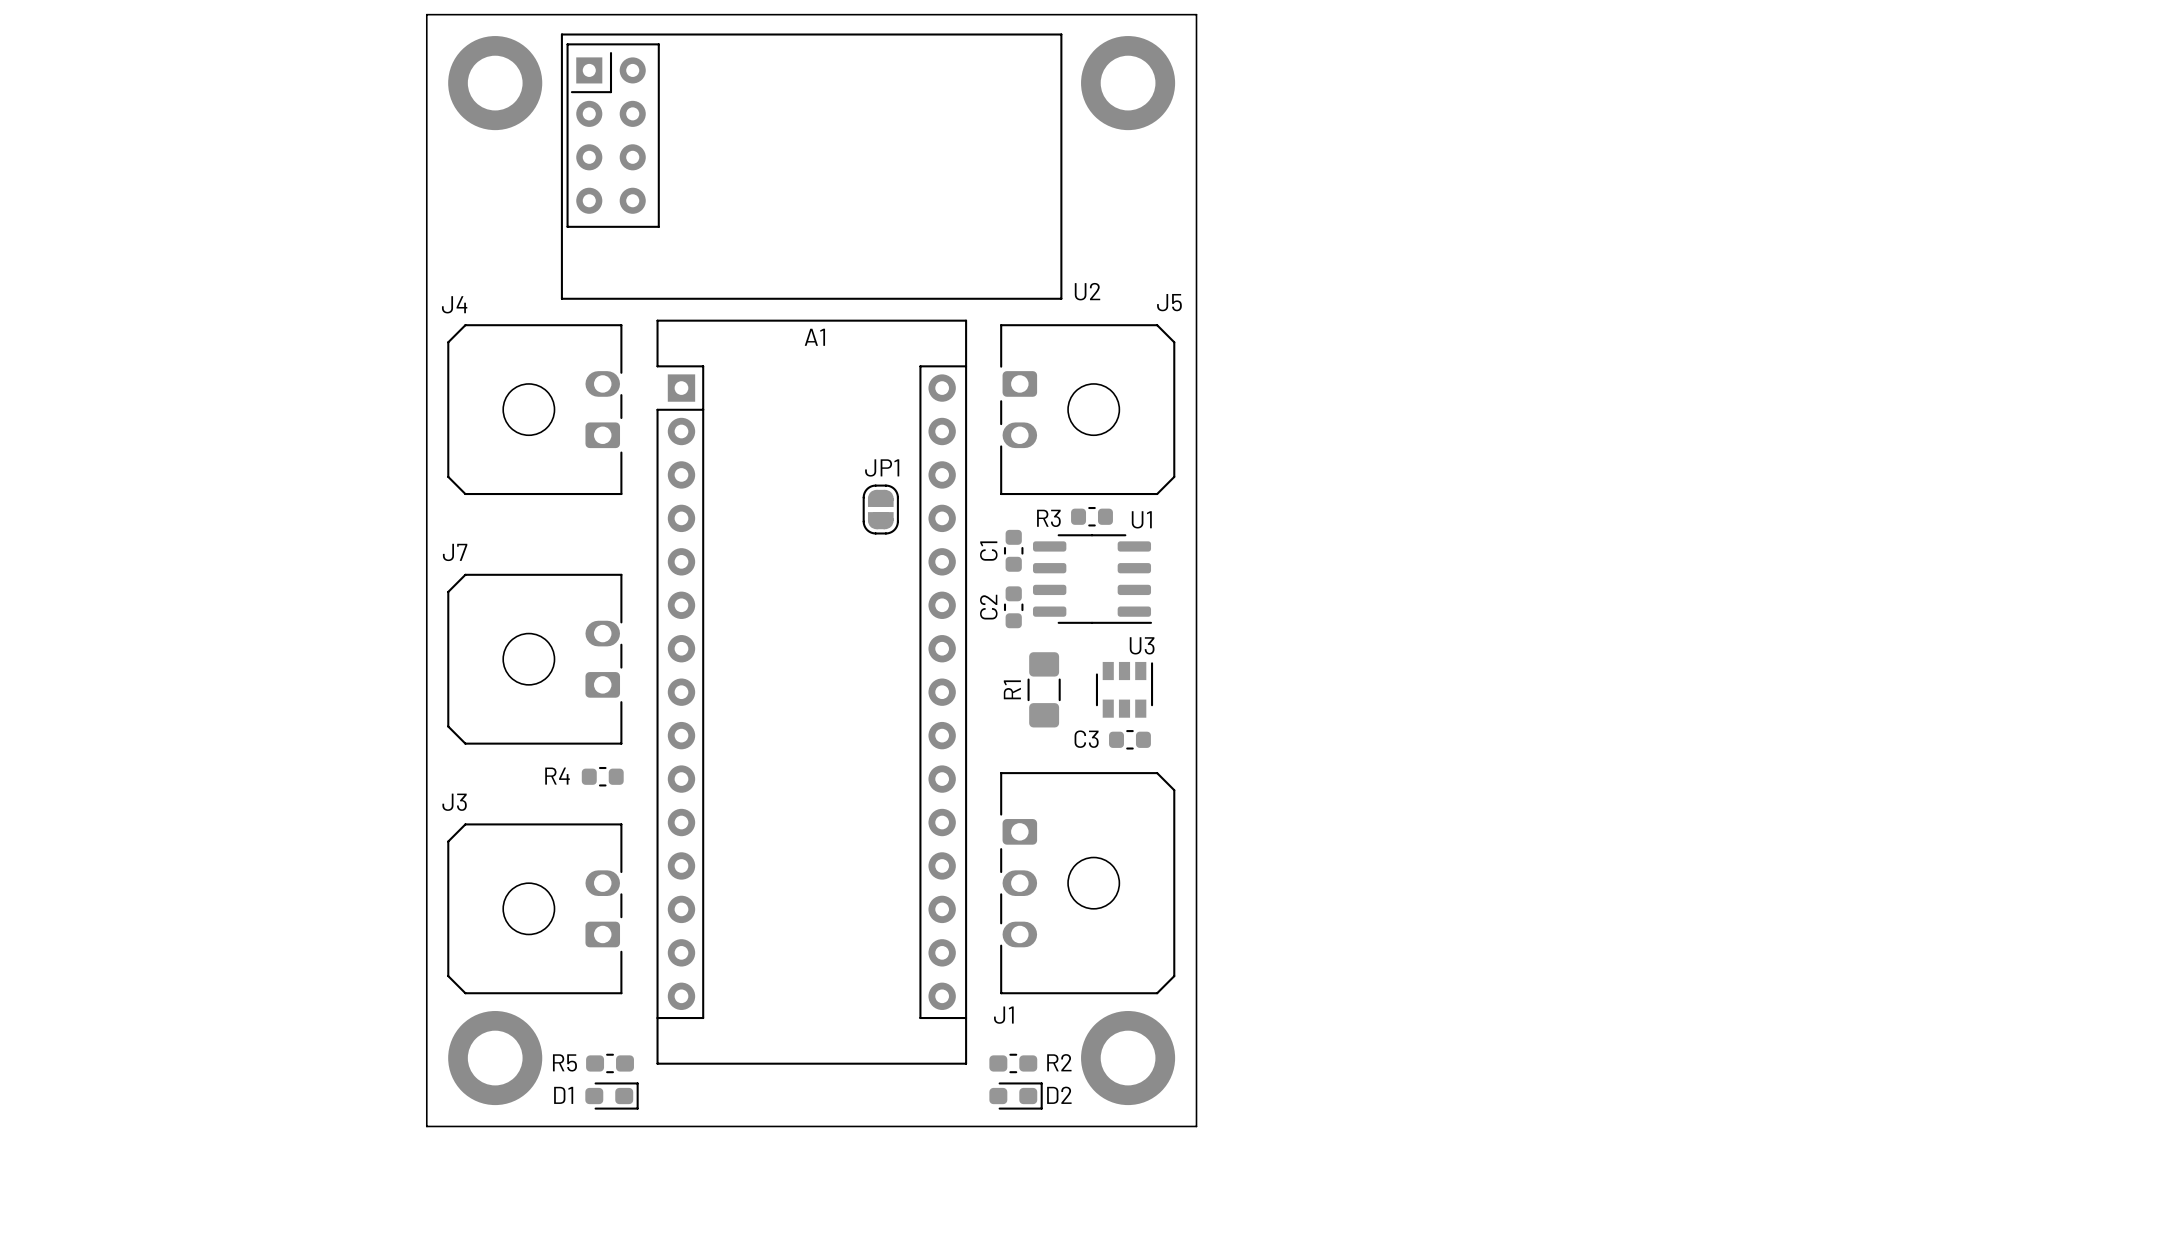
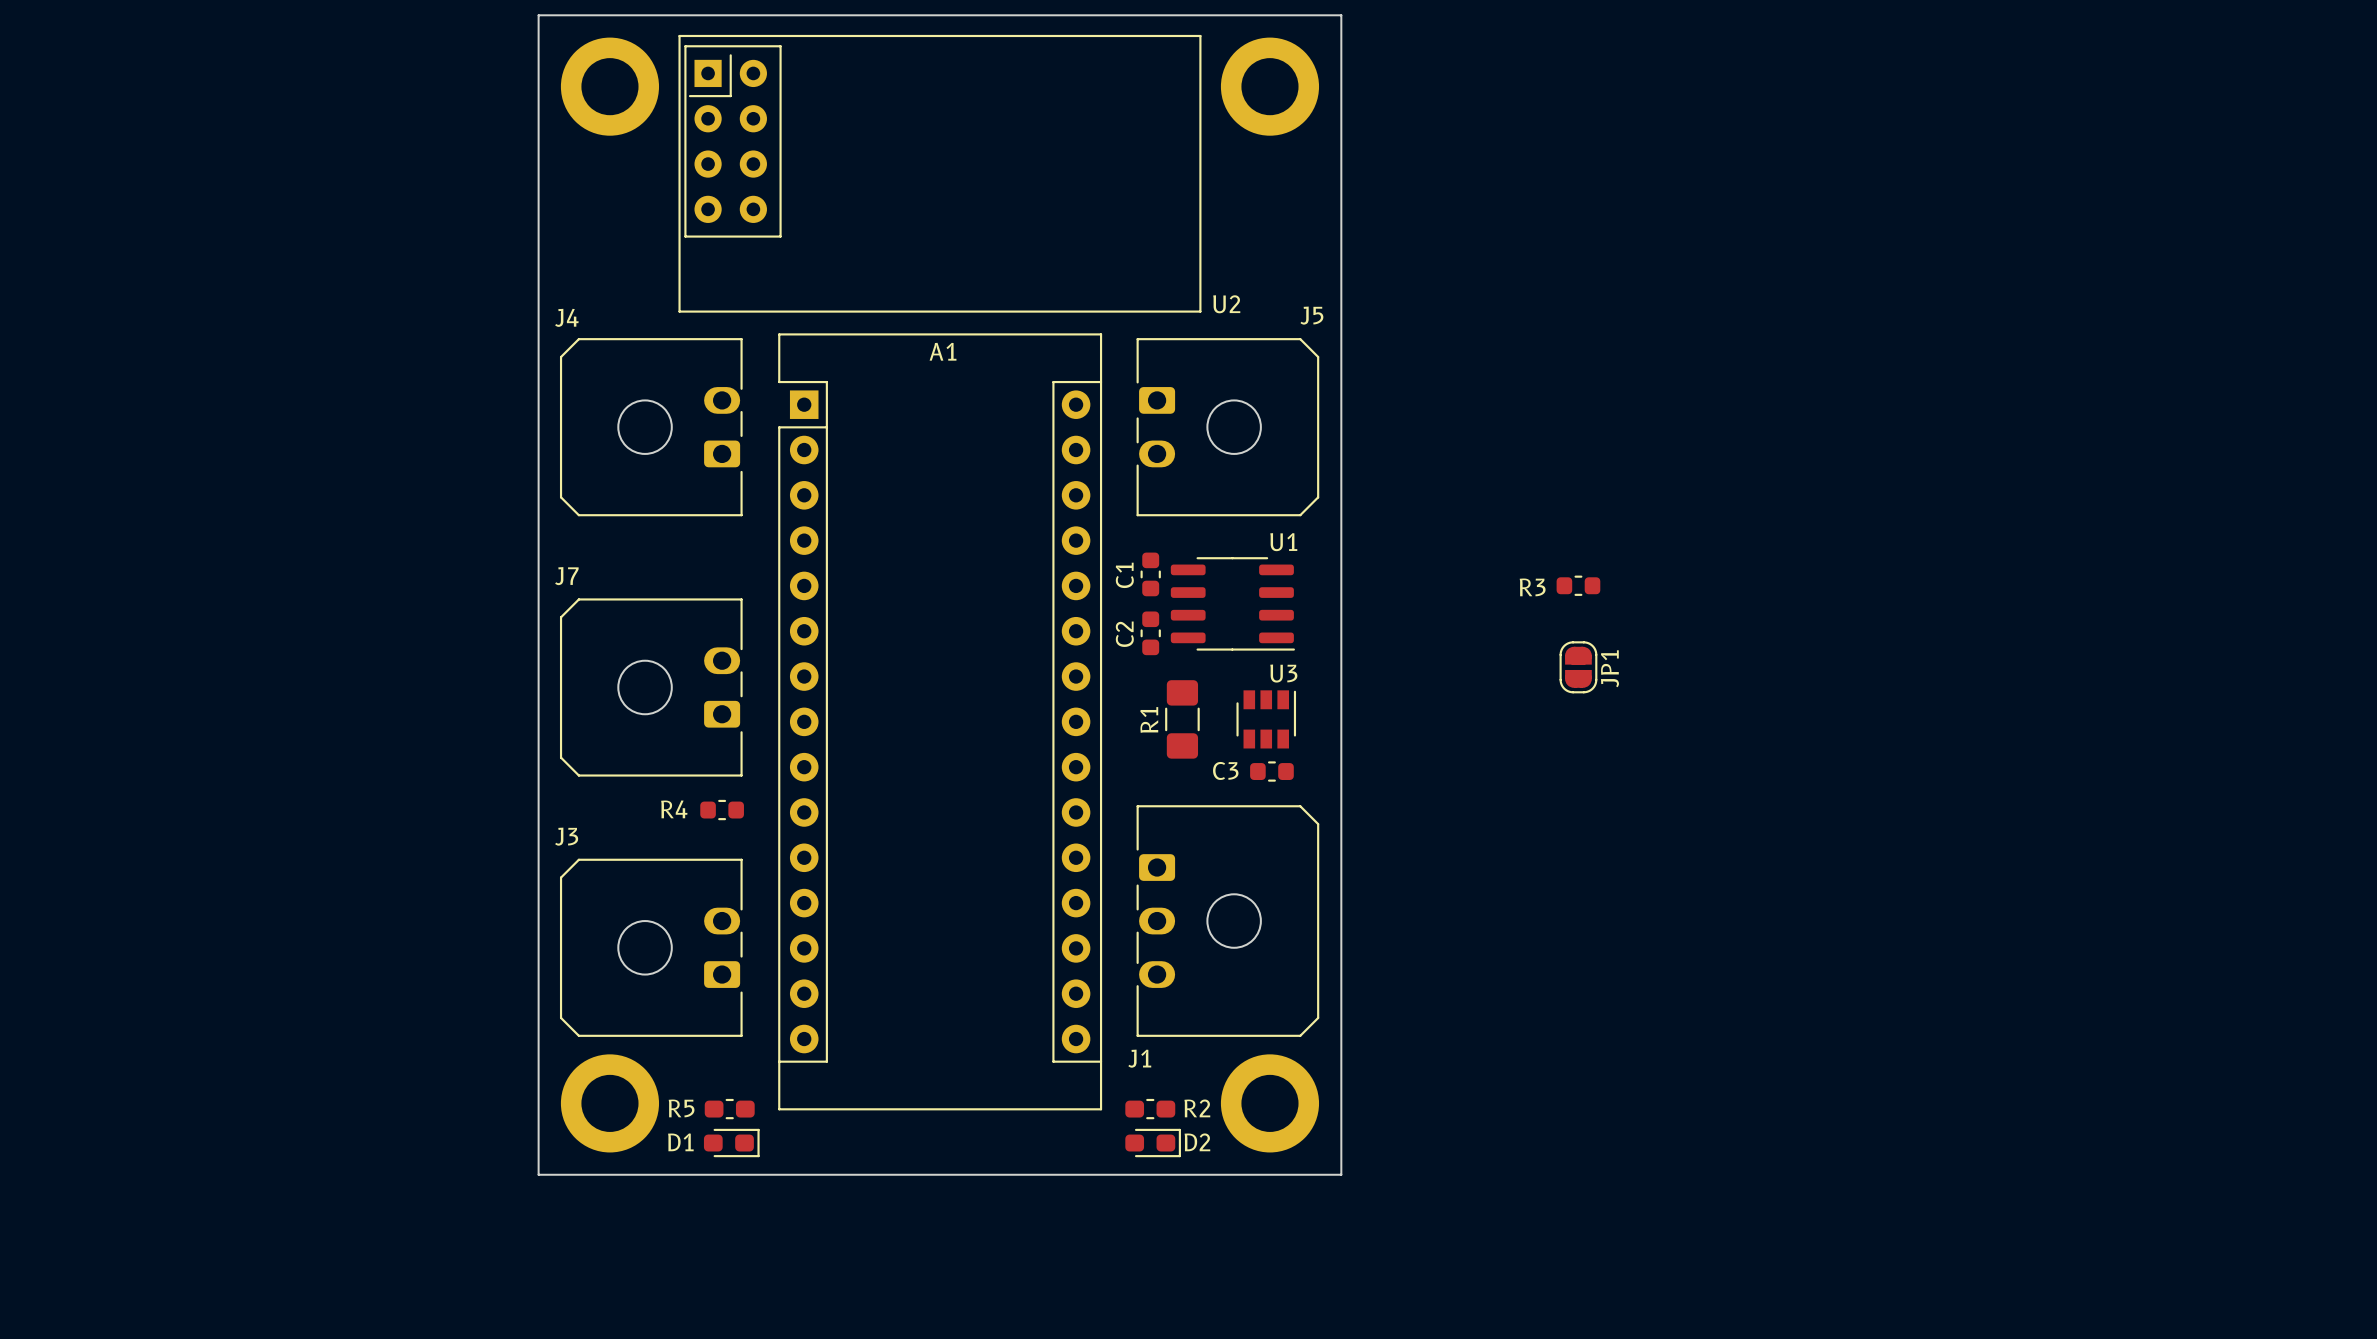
JP1 name rotation: 0° (882, 467) -> 90° counterclockwise (1609, 668)
JP1 position: (880, 509) -> (1578, 667)
R3 position: (1092, 516) -> (1578, 585)

